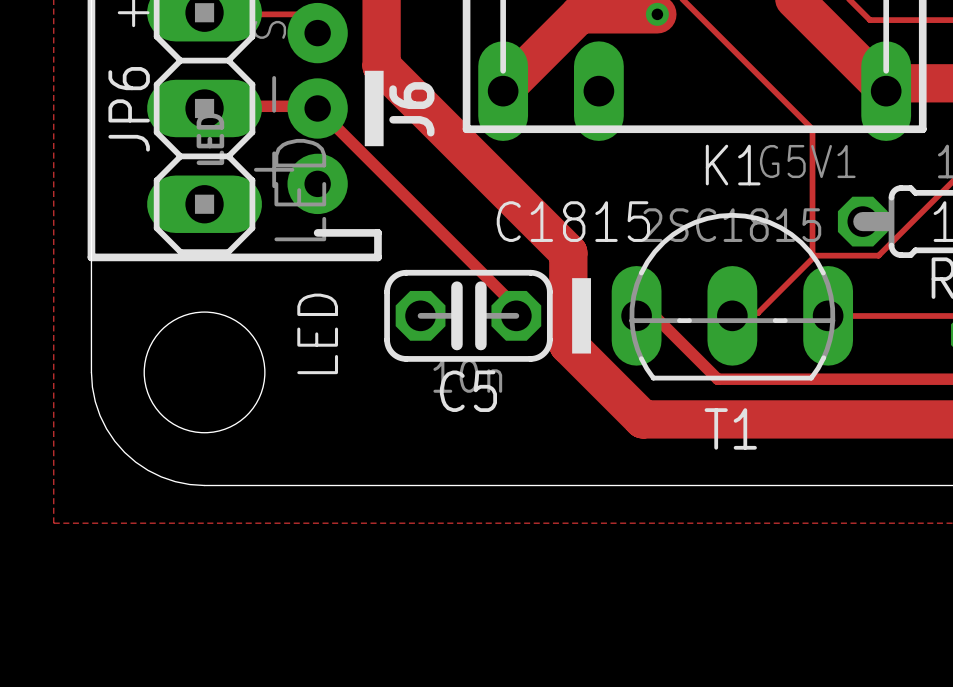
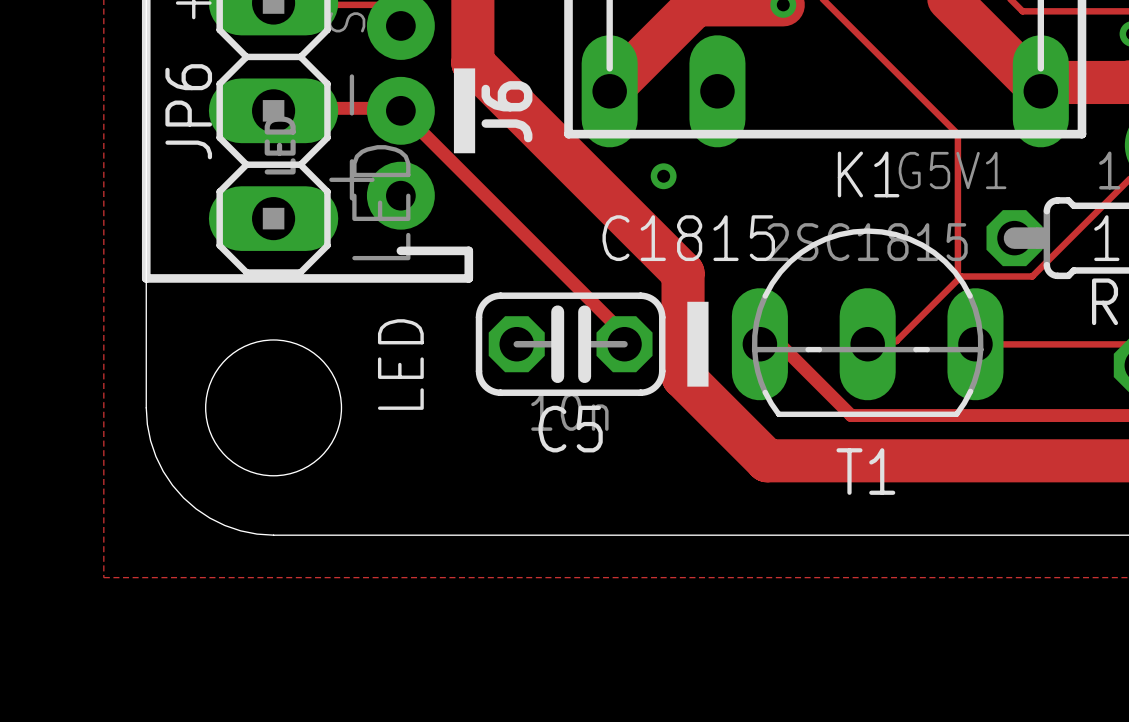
via: none -> (663, 176)

